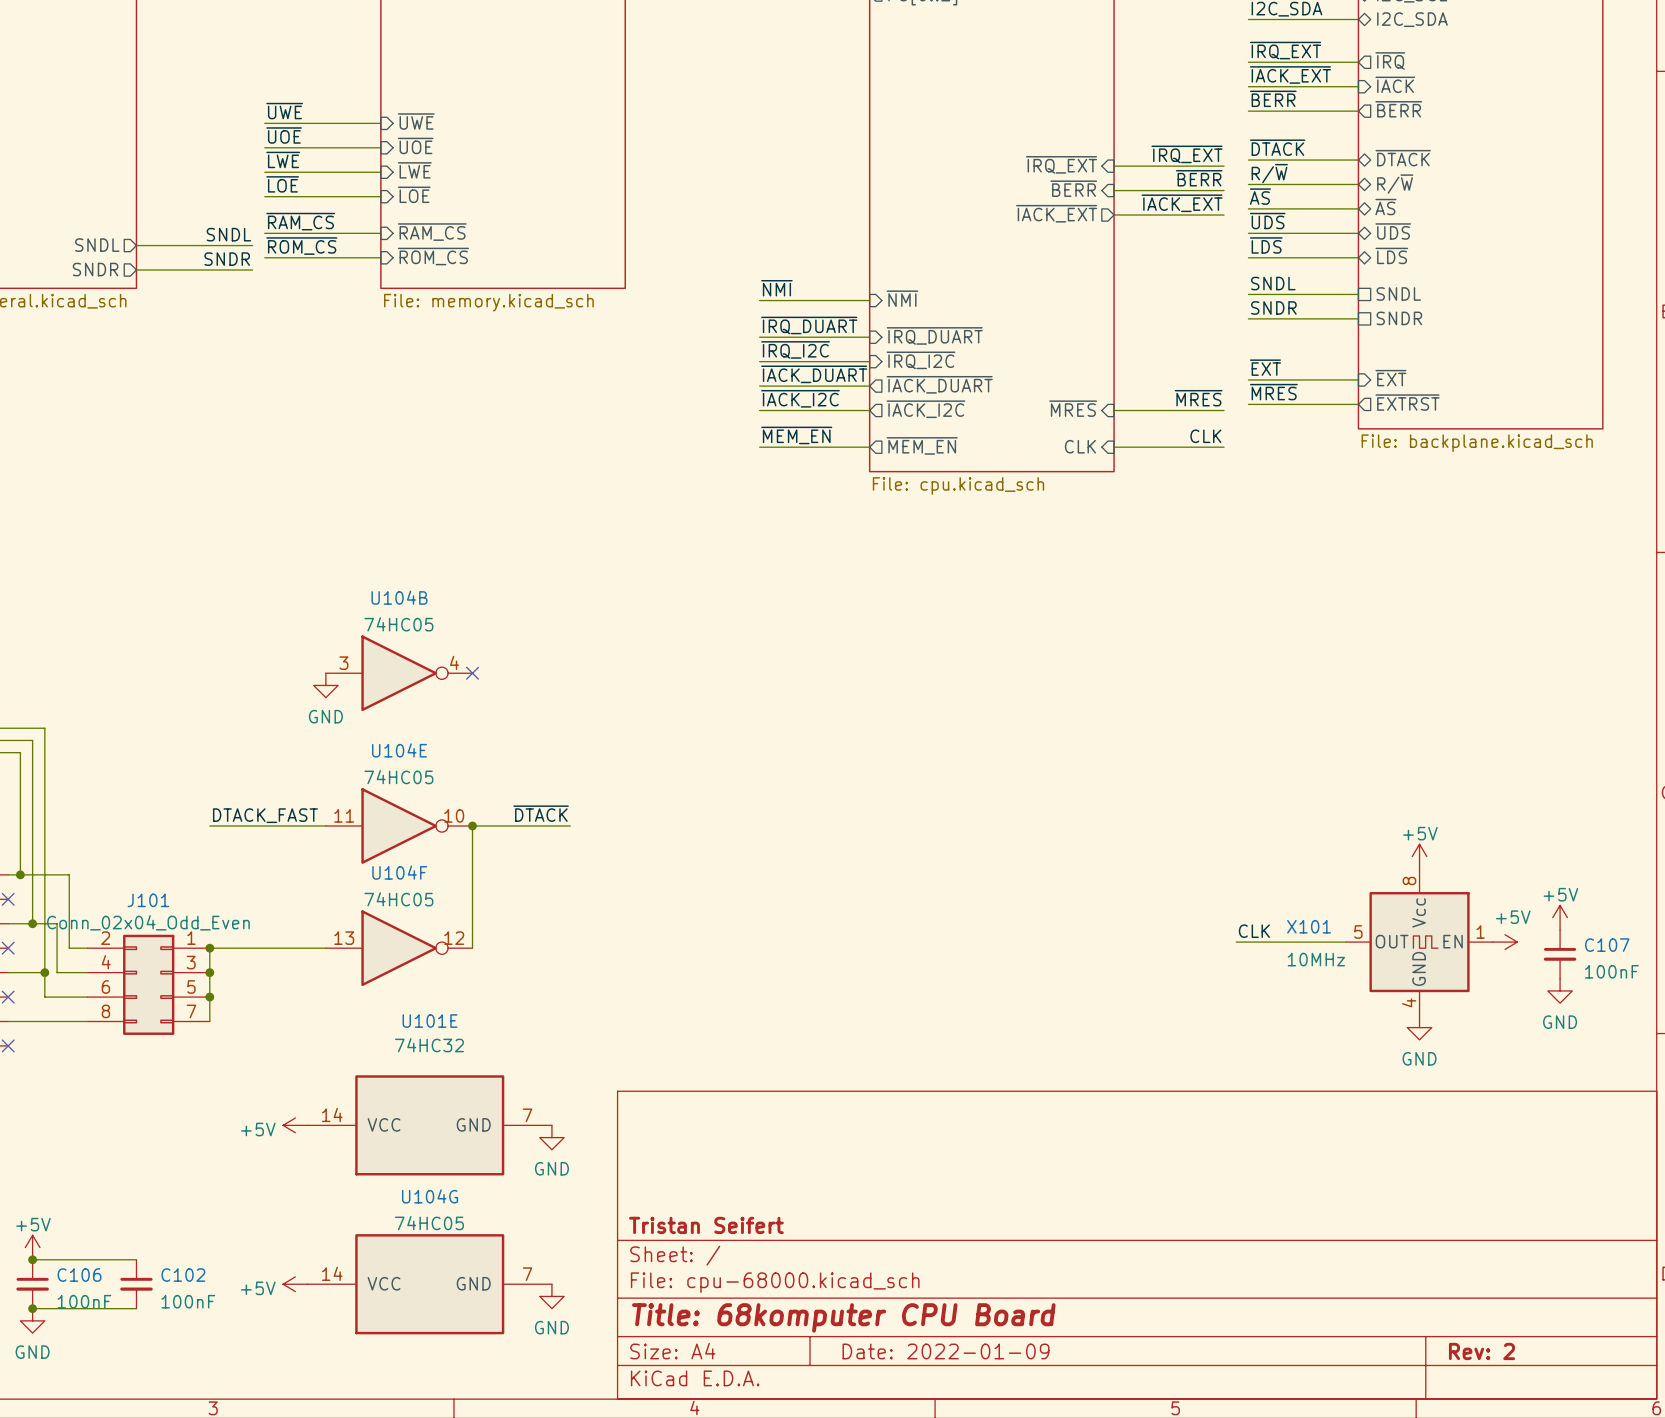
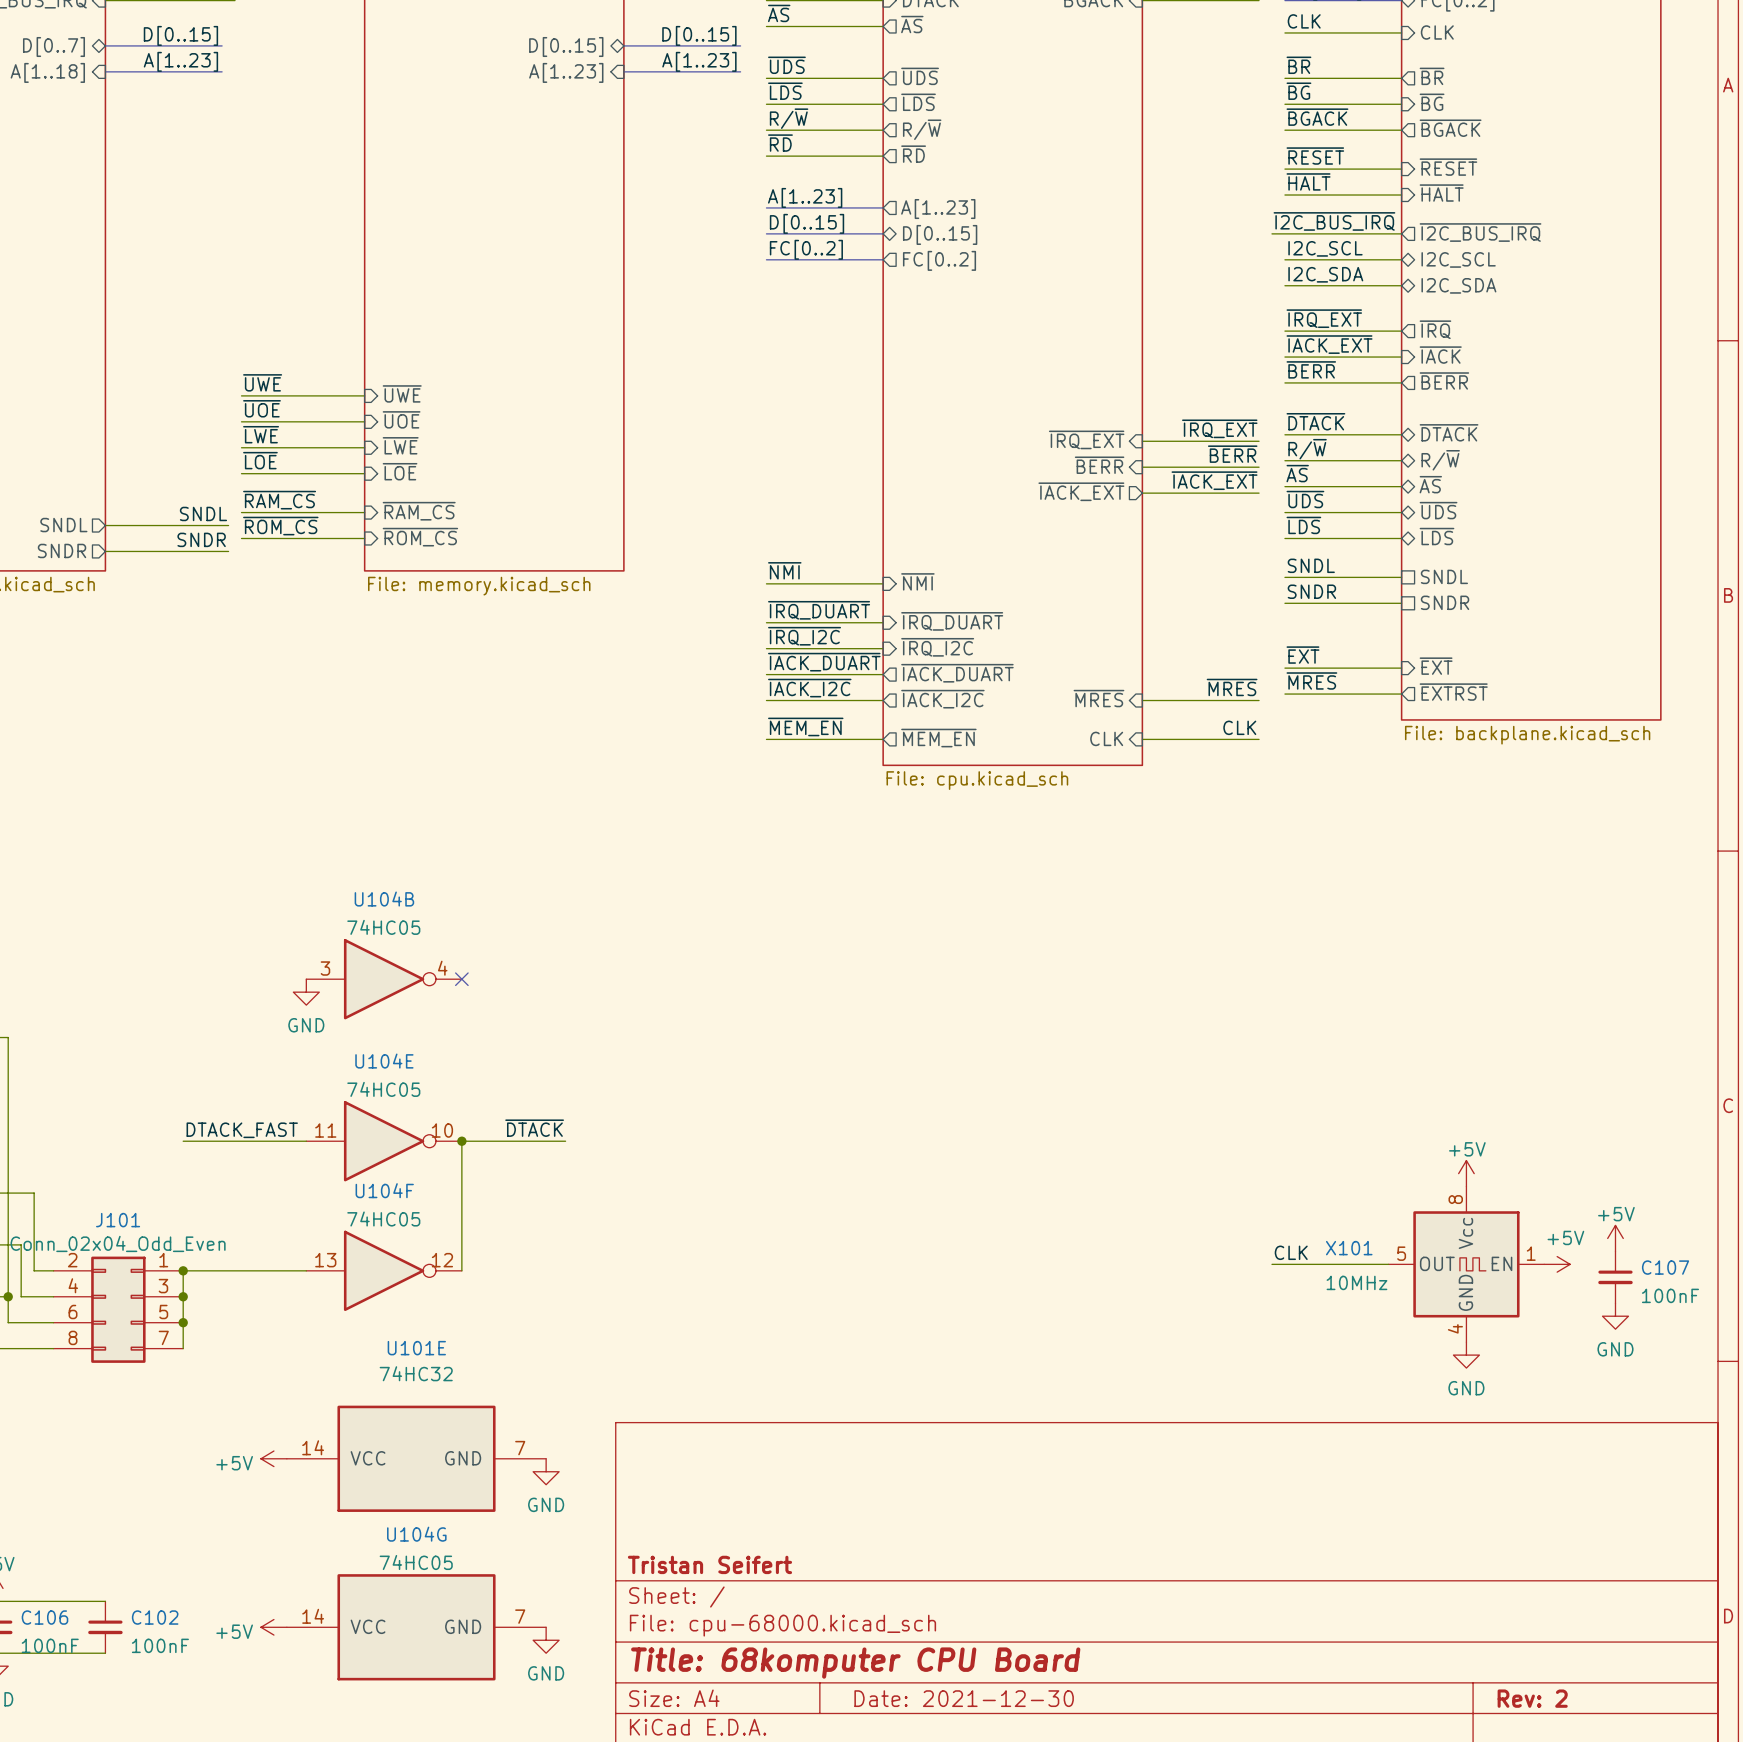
title block: Date: 2022-01-09 (946, 1351) -> Date: 2021-12-30 (964, 1698)

